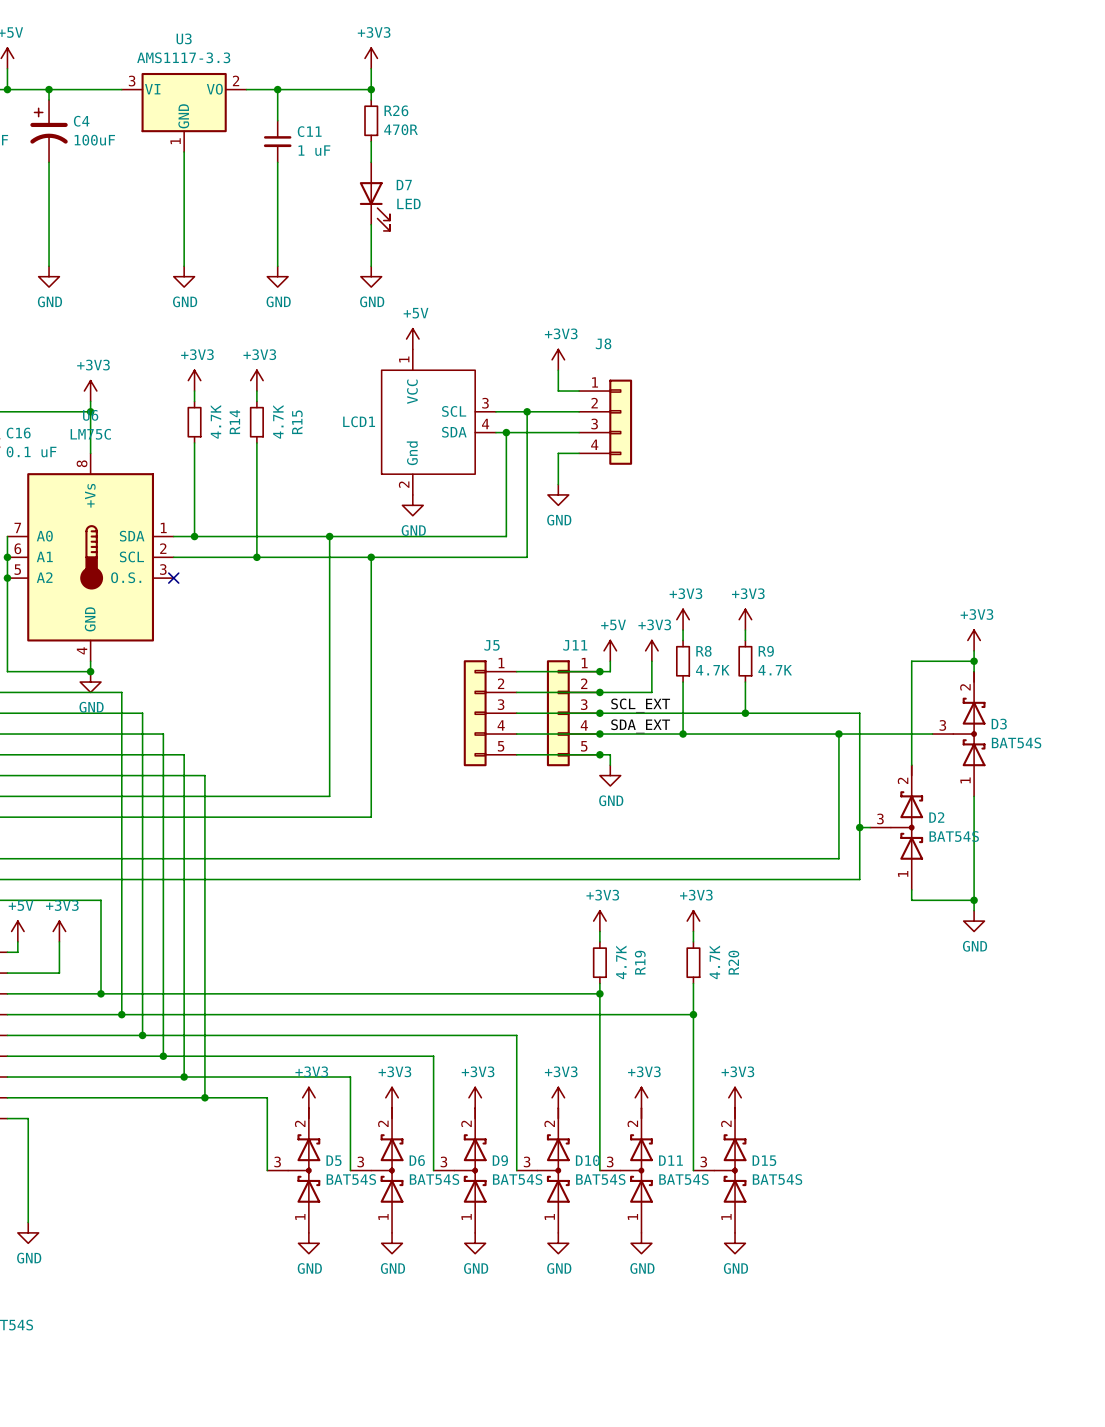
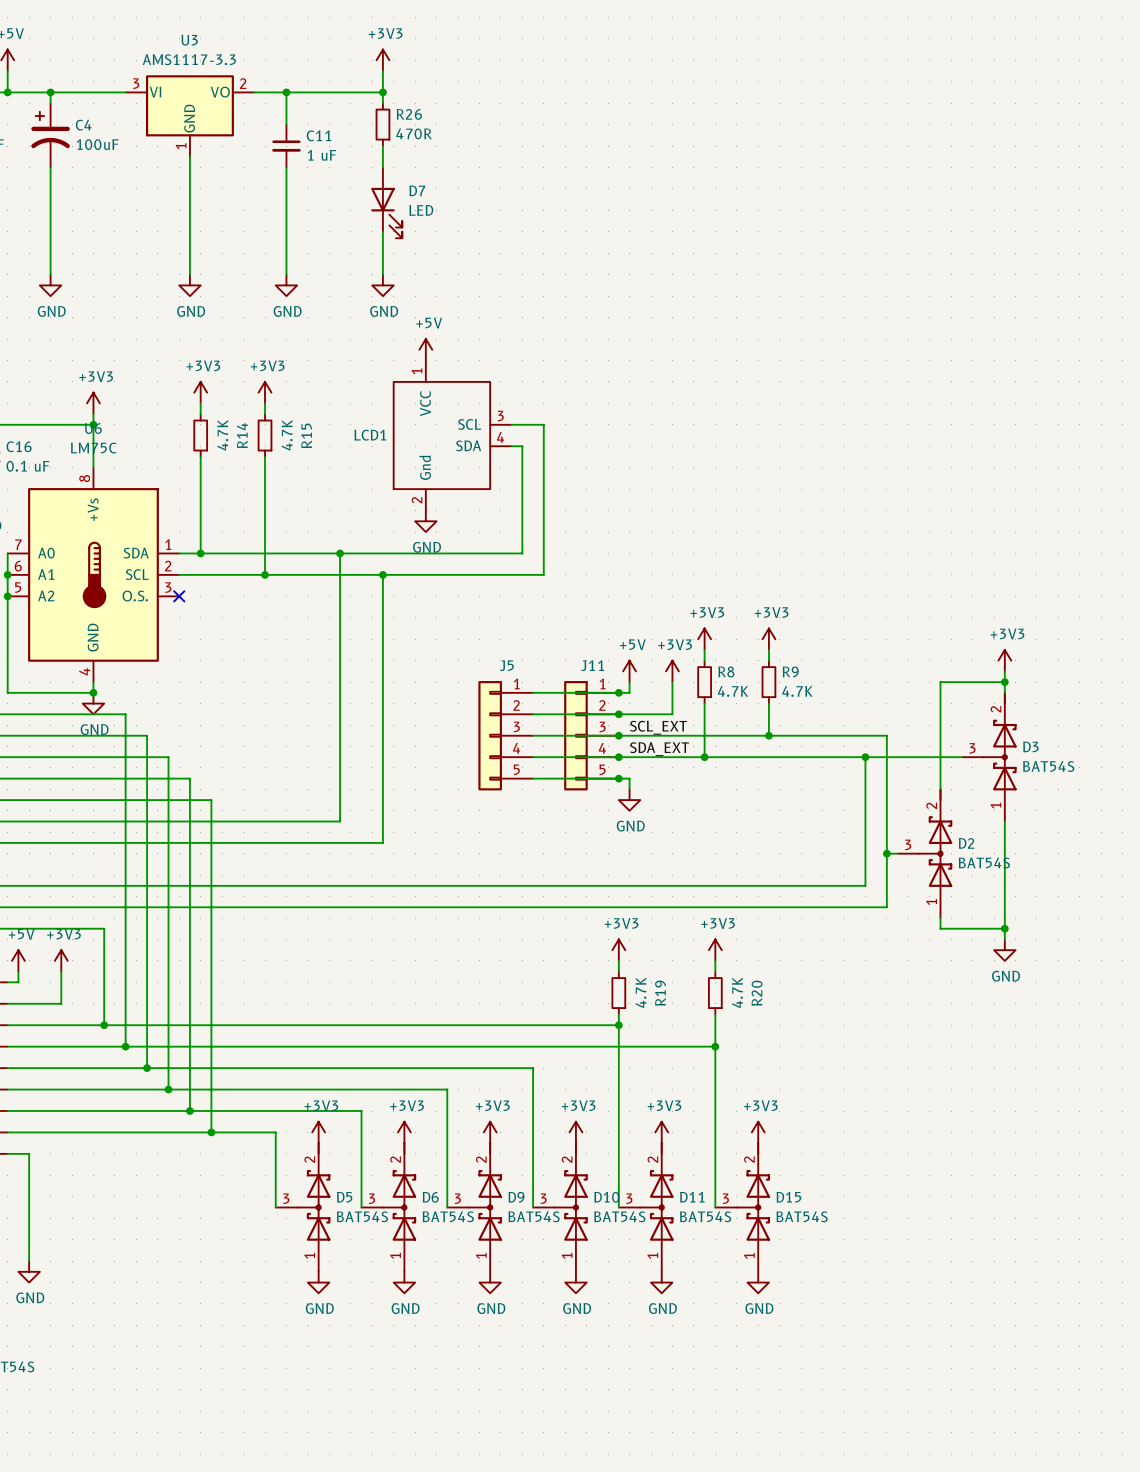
power symbol: +3V3 (558, 359) -> none
wire: (558, 370) (558, 391) (579, 391) -> none
wire: (527, 411) (579, 411) -> none
junction: (527, 411) -> none
J8: (605, 422) -> none
wire: (506, 432) (579, 432) -> none
junction: (506, 432) -> none
wire: (579, 453) (558, 453) (558, 484) -> none
power symbol: GND (558, 494) -> none

